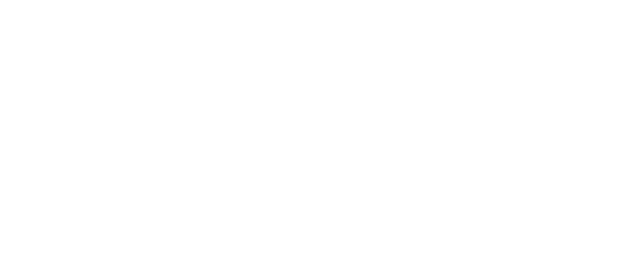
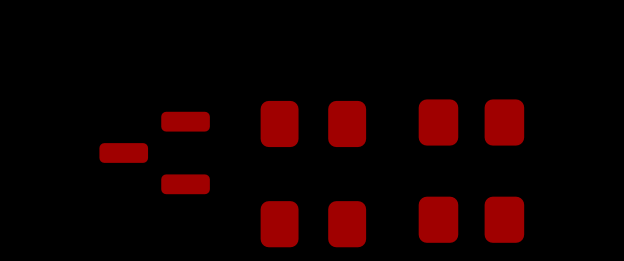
part: none -> (471, 122)
part: none -> (313, 123)
part: none -> (154, 152)
part: none -> (471, 219)
part: none -> (313, 224)

